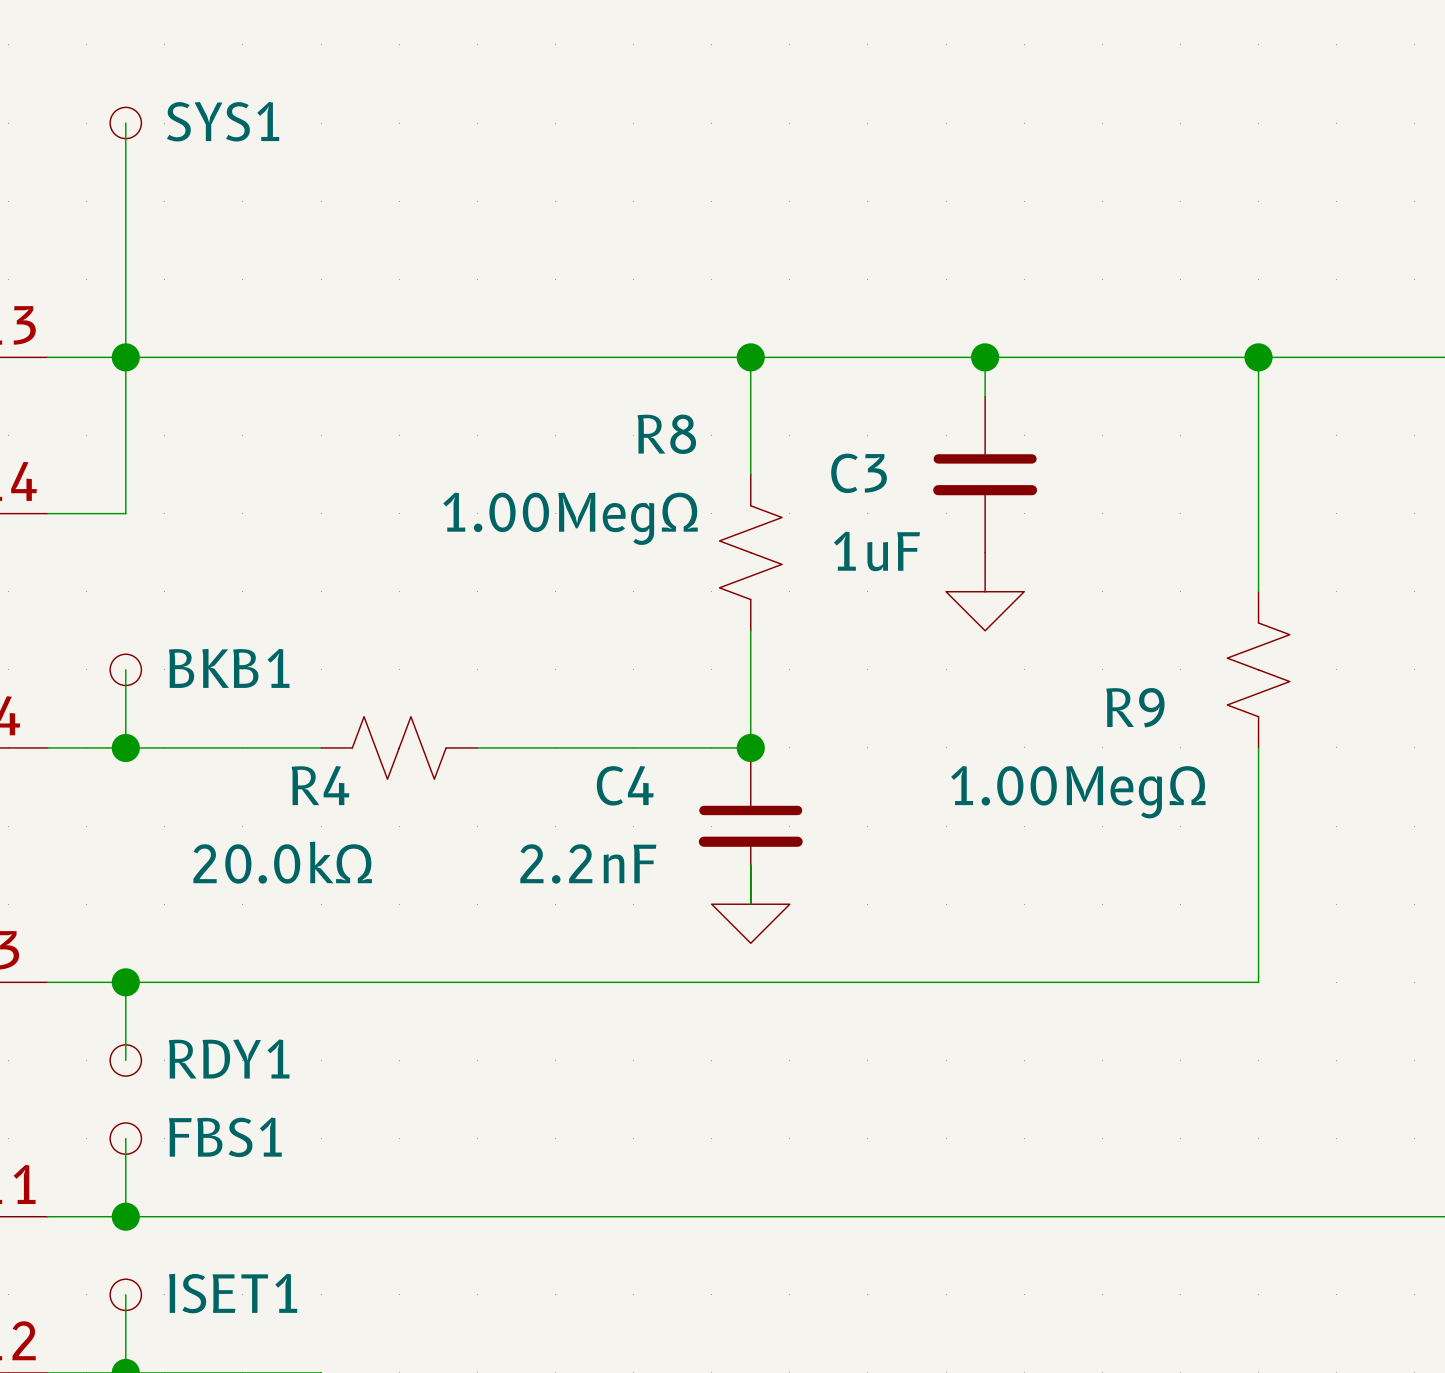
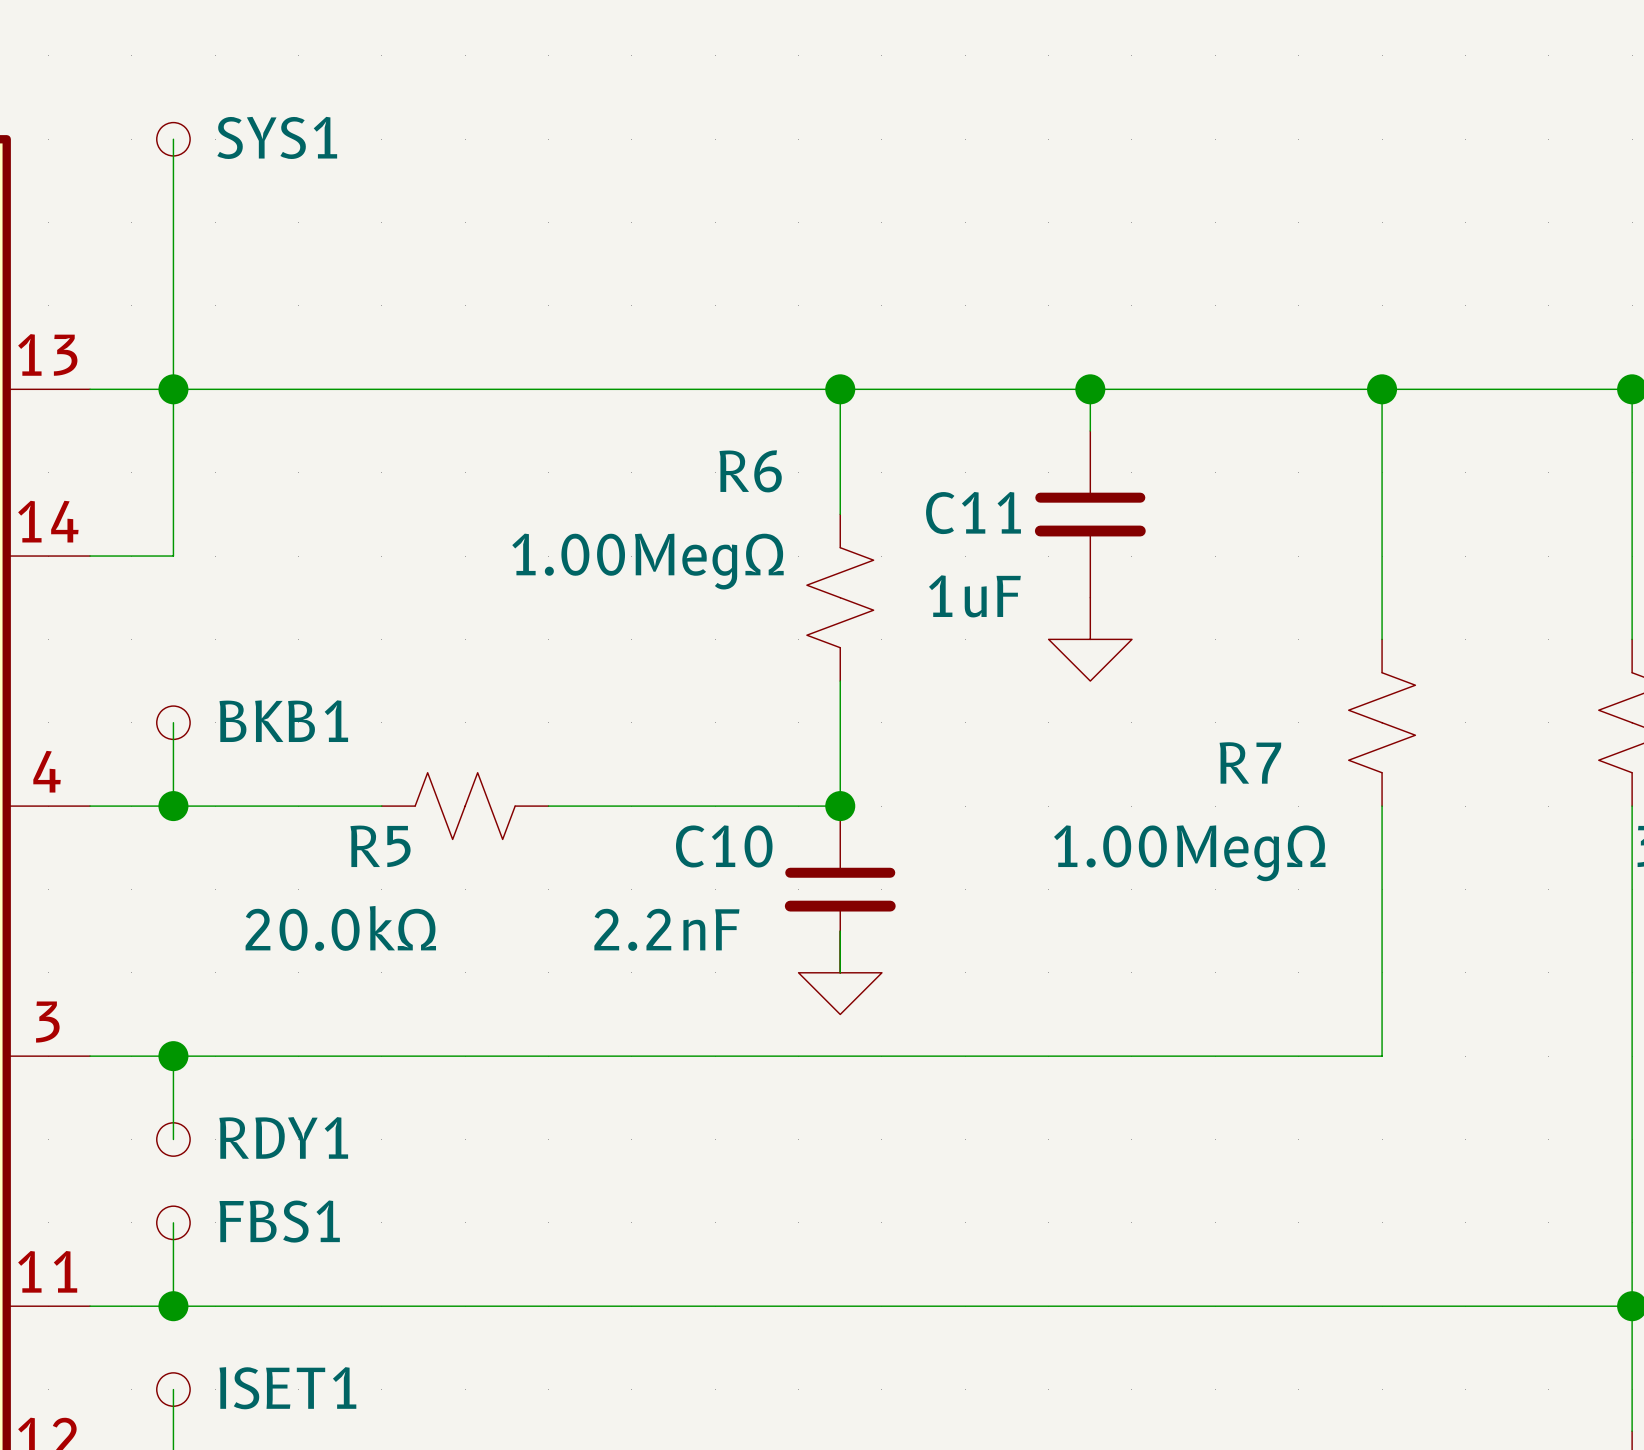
R8 name: R8 (666, 434) -> R6 (750, 471)
C3 name: C3 (859, 473) -> C11 (973, 513)
R9 name: R9 (1135, 707) -> R7 (1250, 762)
R4 name: R4 (320, 785) -> R5 (380, 846)
C4 name: C4 (625, 785) -> C10 (724, 846)

